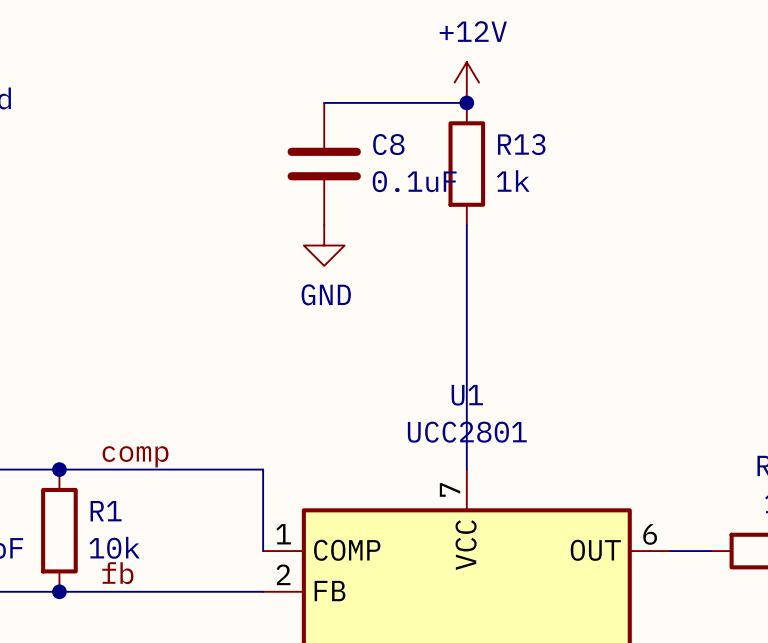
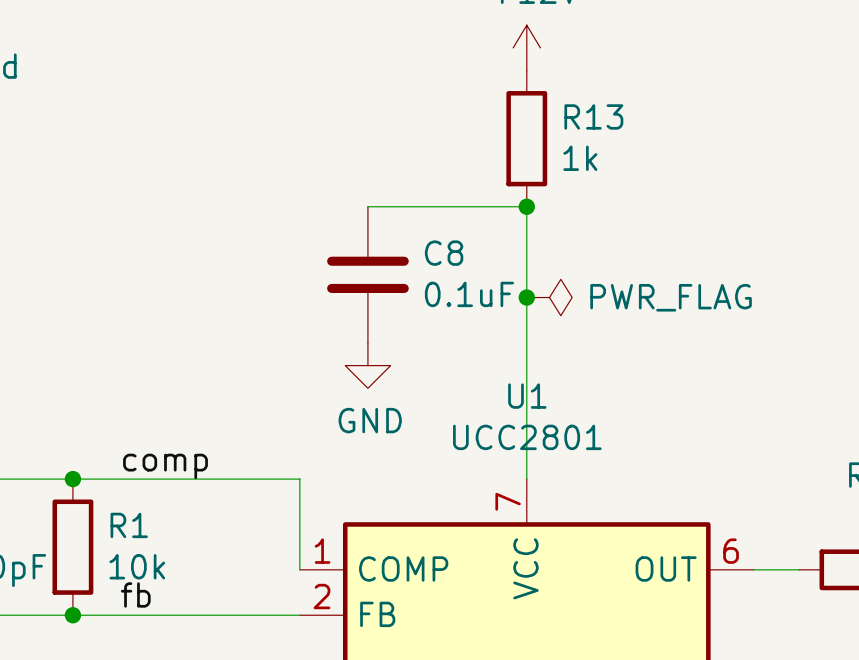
wire: (324, 102) (466, 102) -> (367, 206) (526, 206)
junction: (466, 102) -> none
C8 position: (324, 164) -> (367, 274)
junction: none -> (526, 206)
power symbol position: GND (324, 245) -> GND (367, 365)
junction: none -> (526, 297)
power symbol: none -> PWR_FLAG (549, 297)

